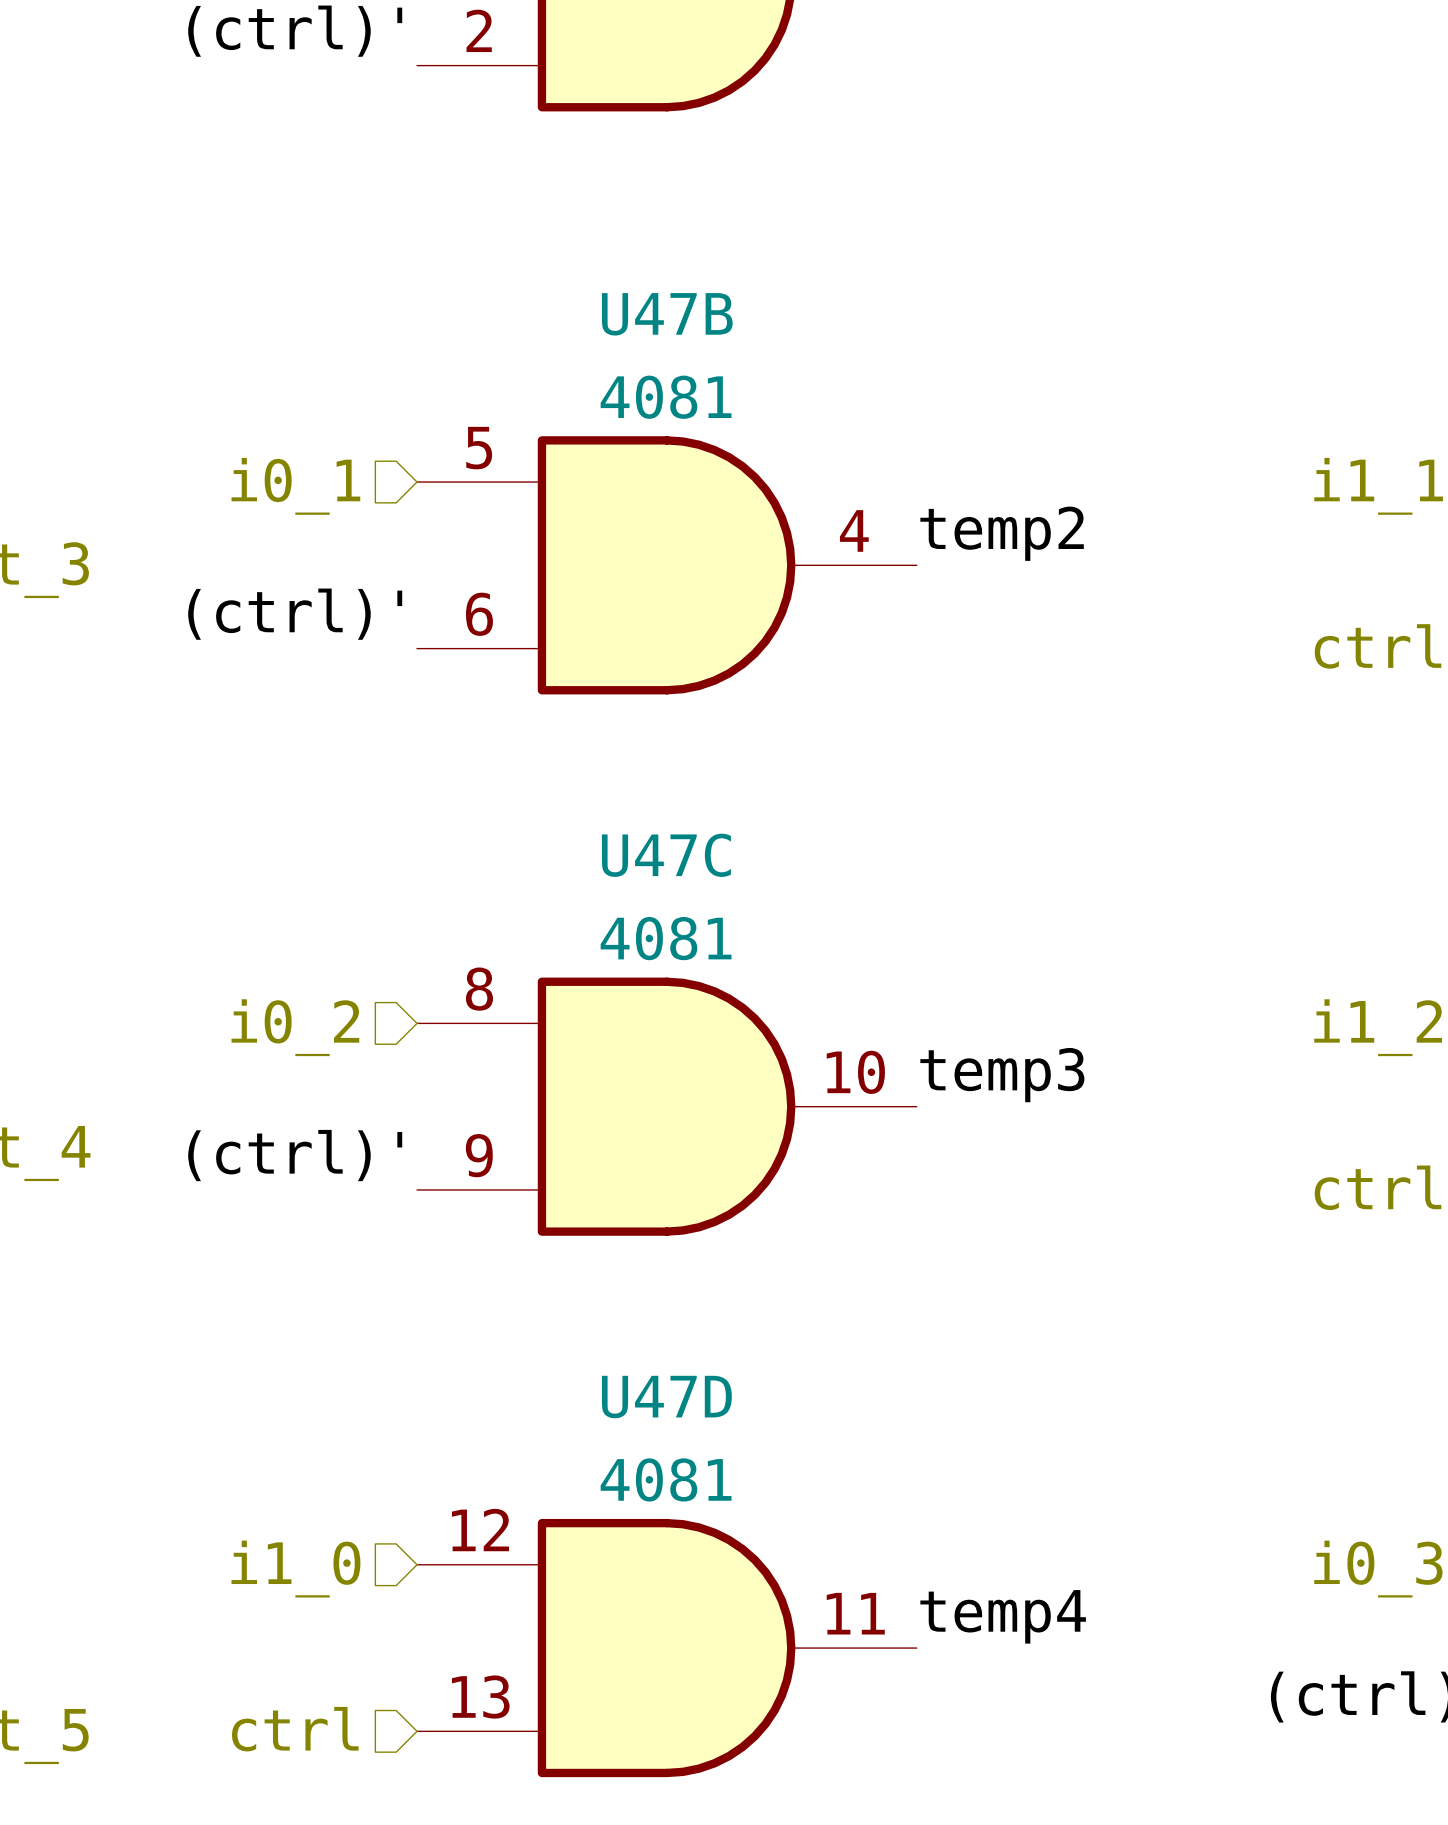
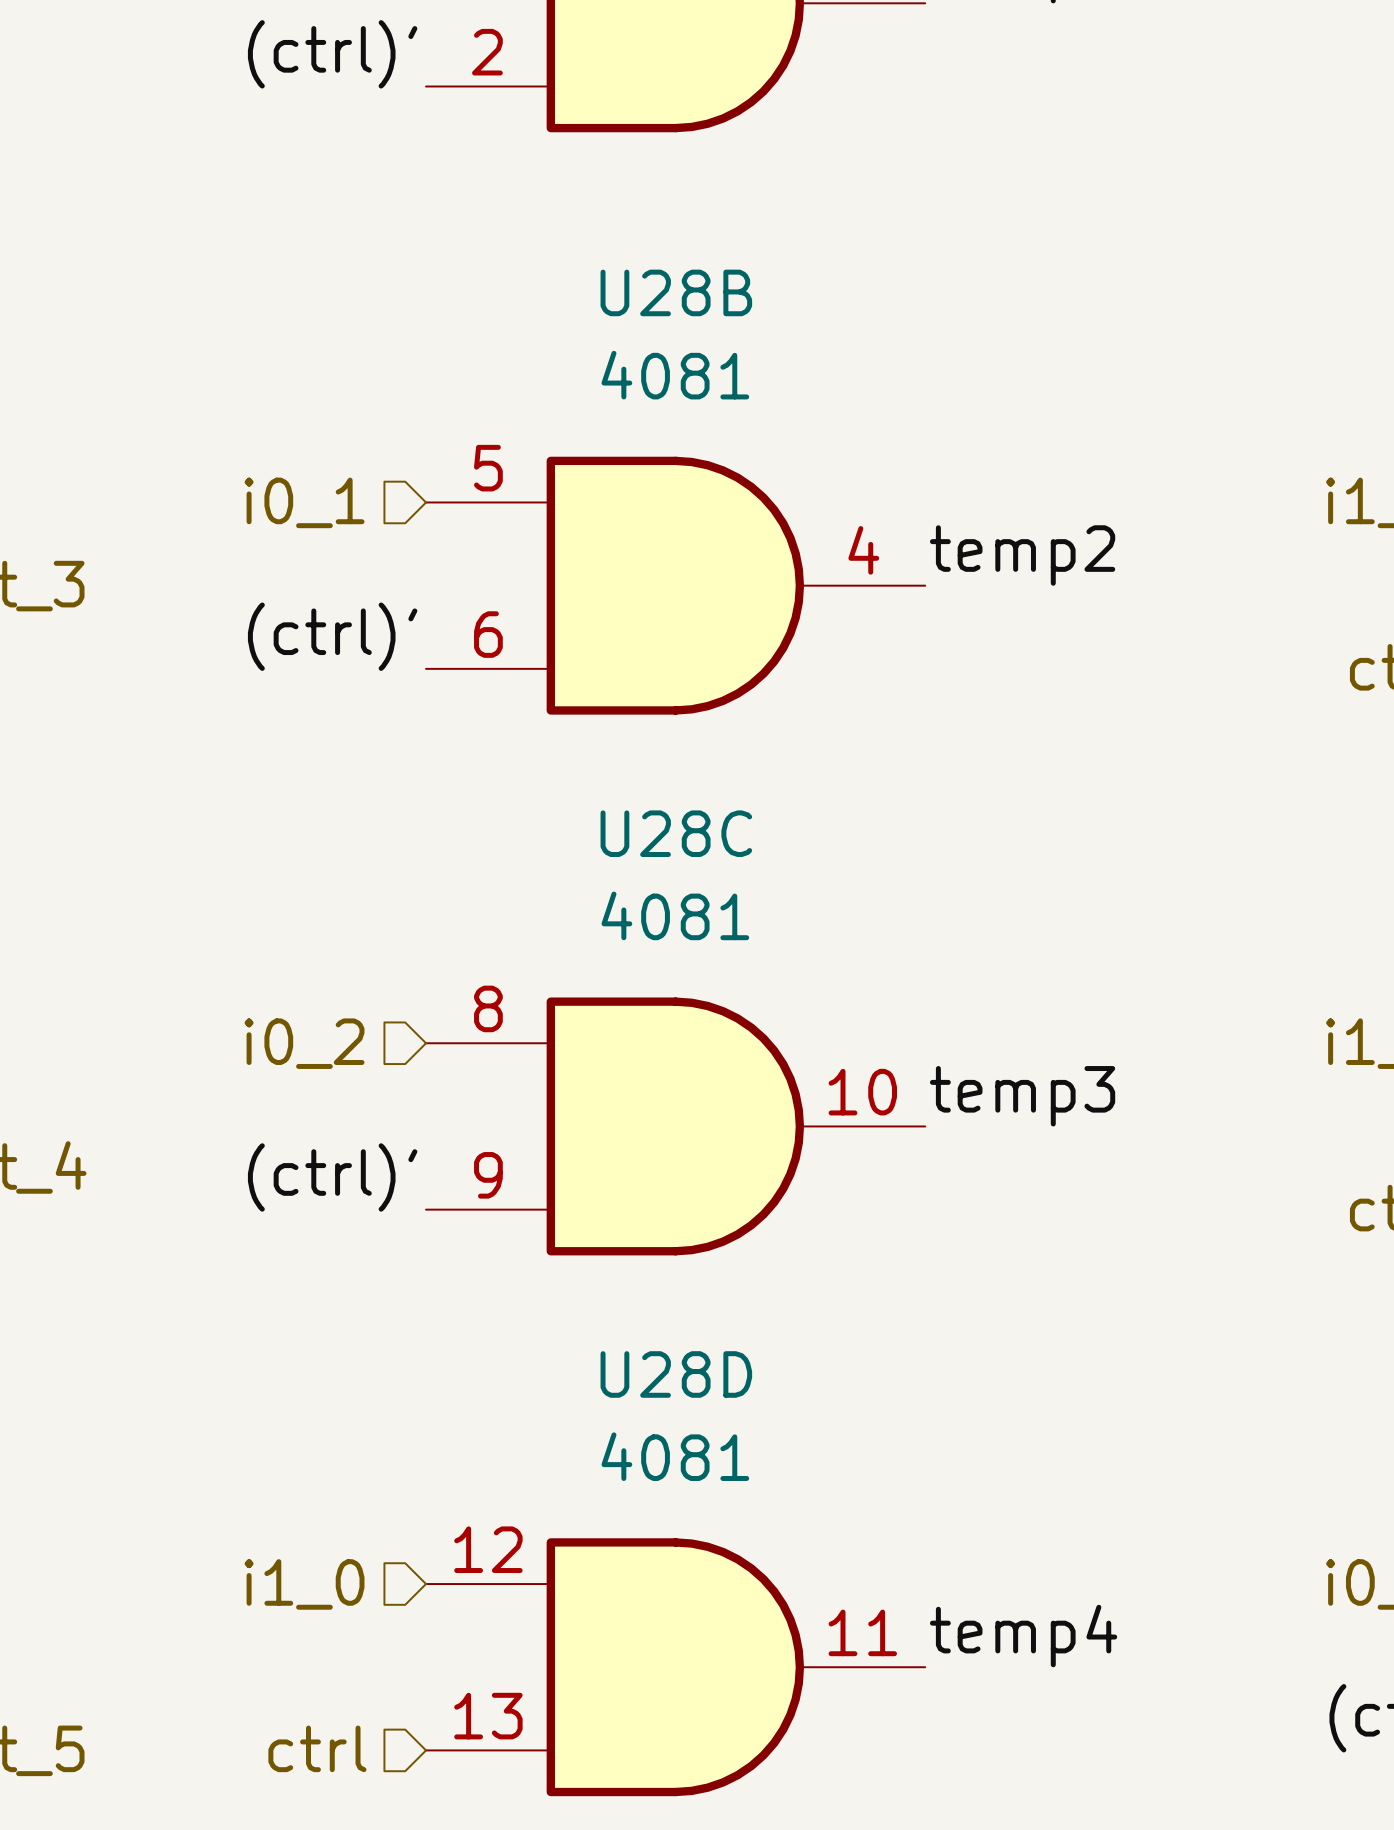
U47B name: U47B (667, 314) -> U28B (676, 292)
U47B value position: 4081 (666, 397) -> 4081 (675, 375)
U47C name: U47C (666, 855) -> U28C (676, 833)
U47C value position: 4081 (666, 938) -> 4081 (675, 915)
U47D name: U47D (666, 1397) -> U28D (676, 1374)
U47D value position: 4081 (666, 1479) -> 4081 (675, 1456)

